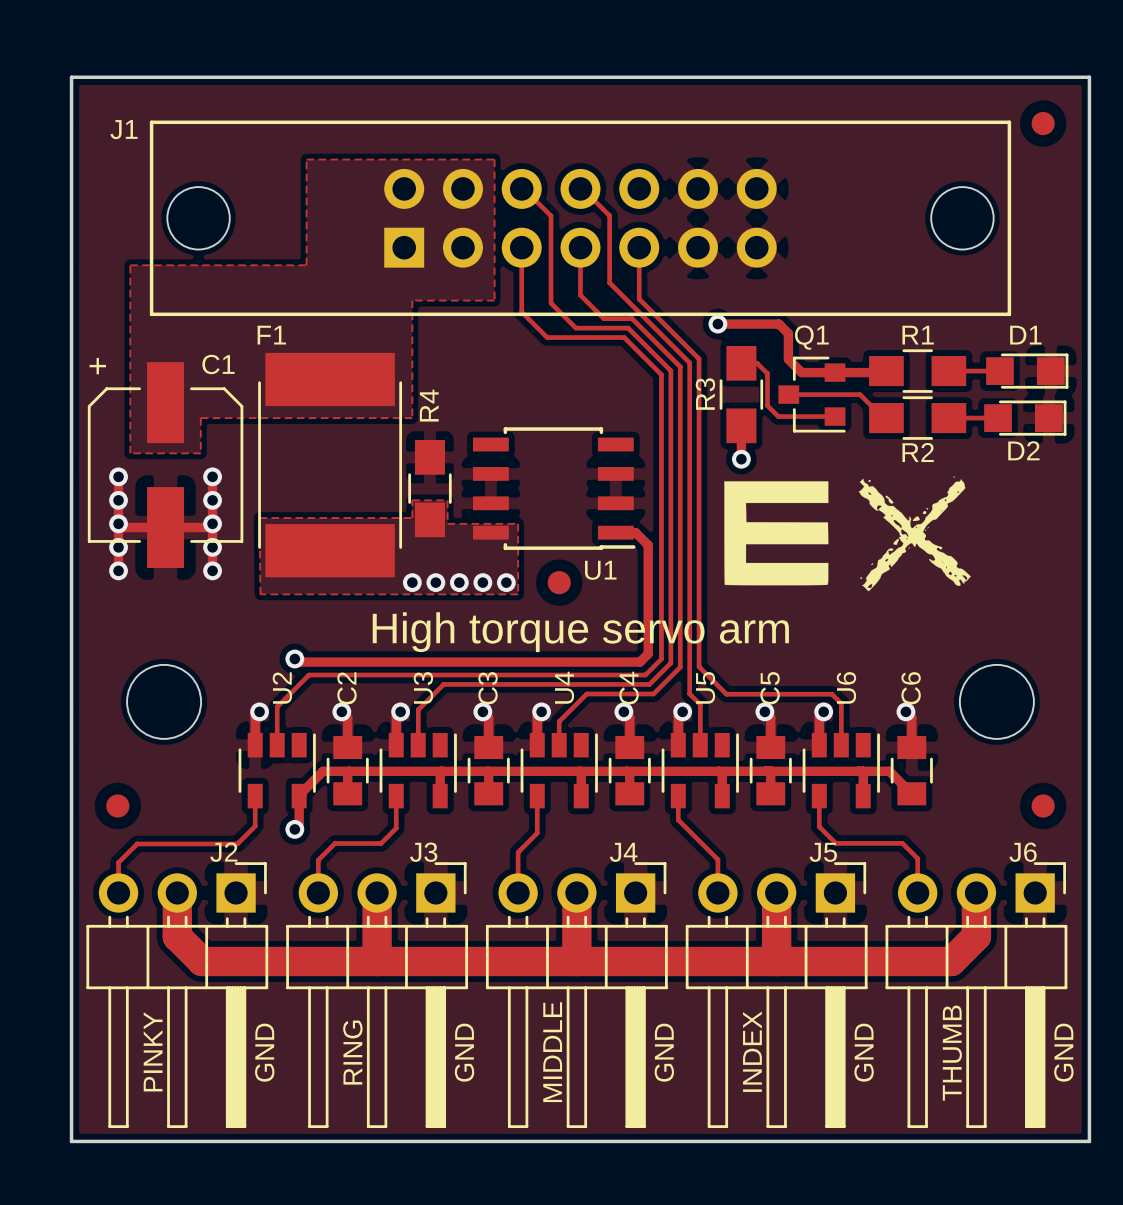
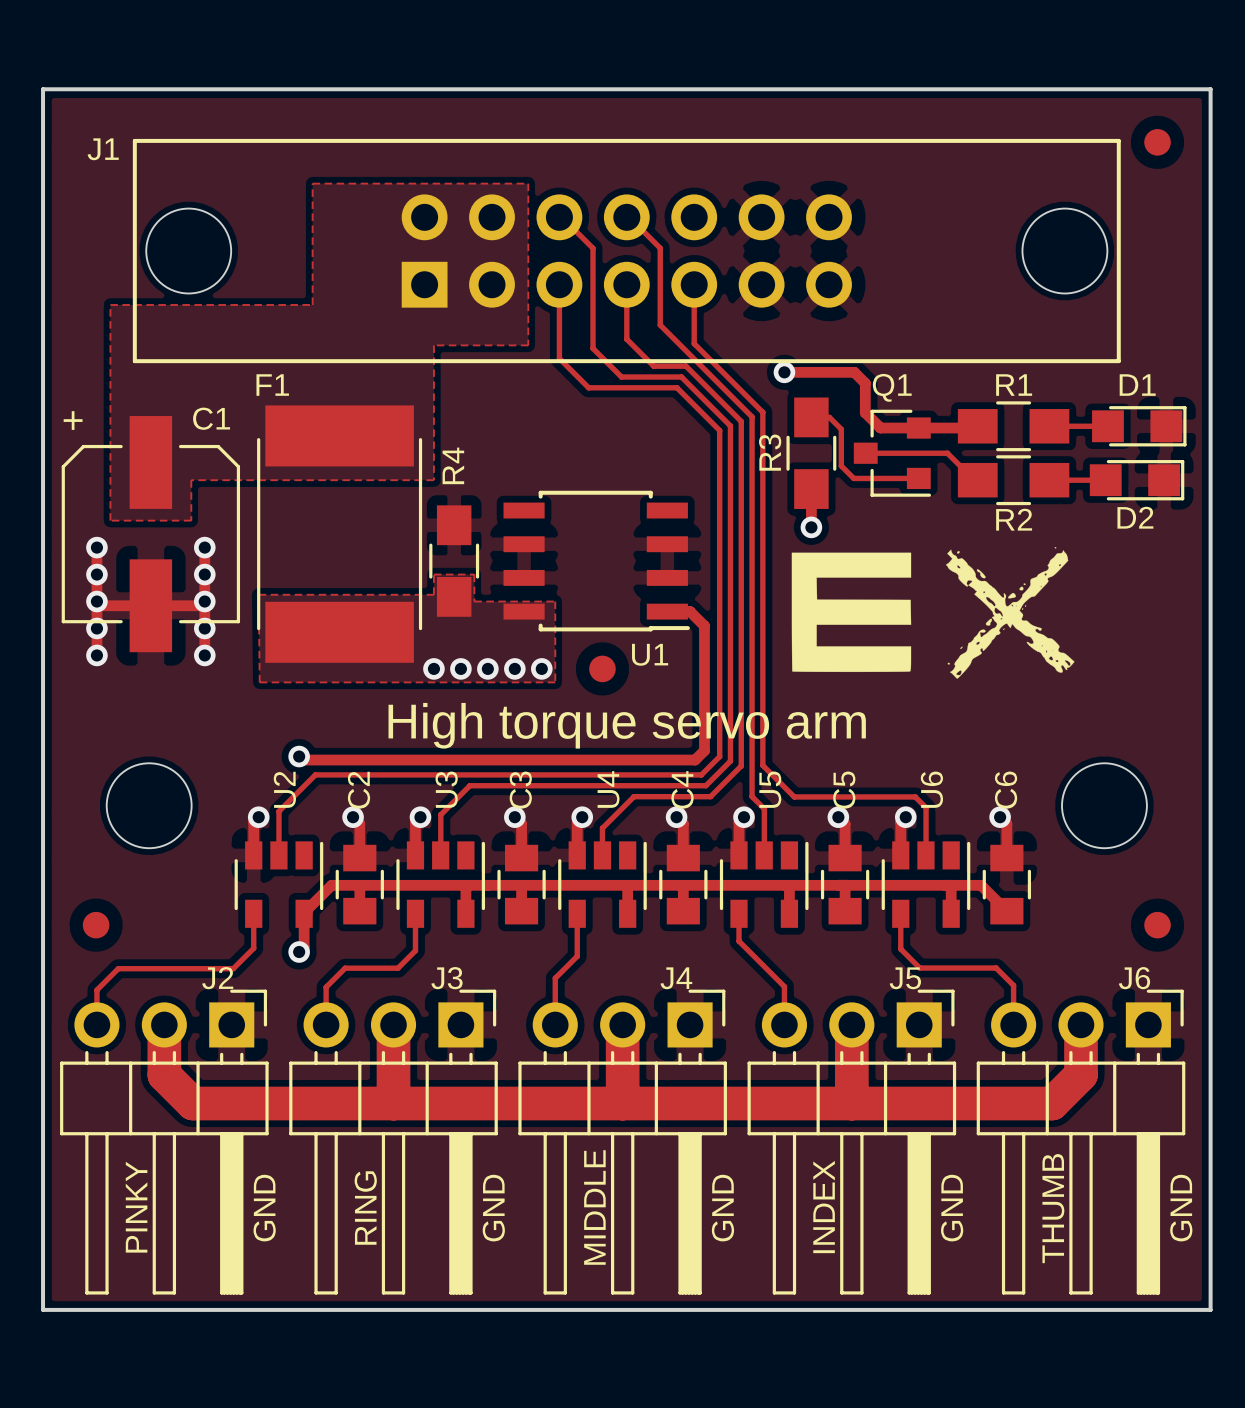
J1 footprint: [149, 120, 1012, 317] -> [132, 138, 1121, 364]

